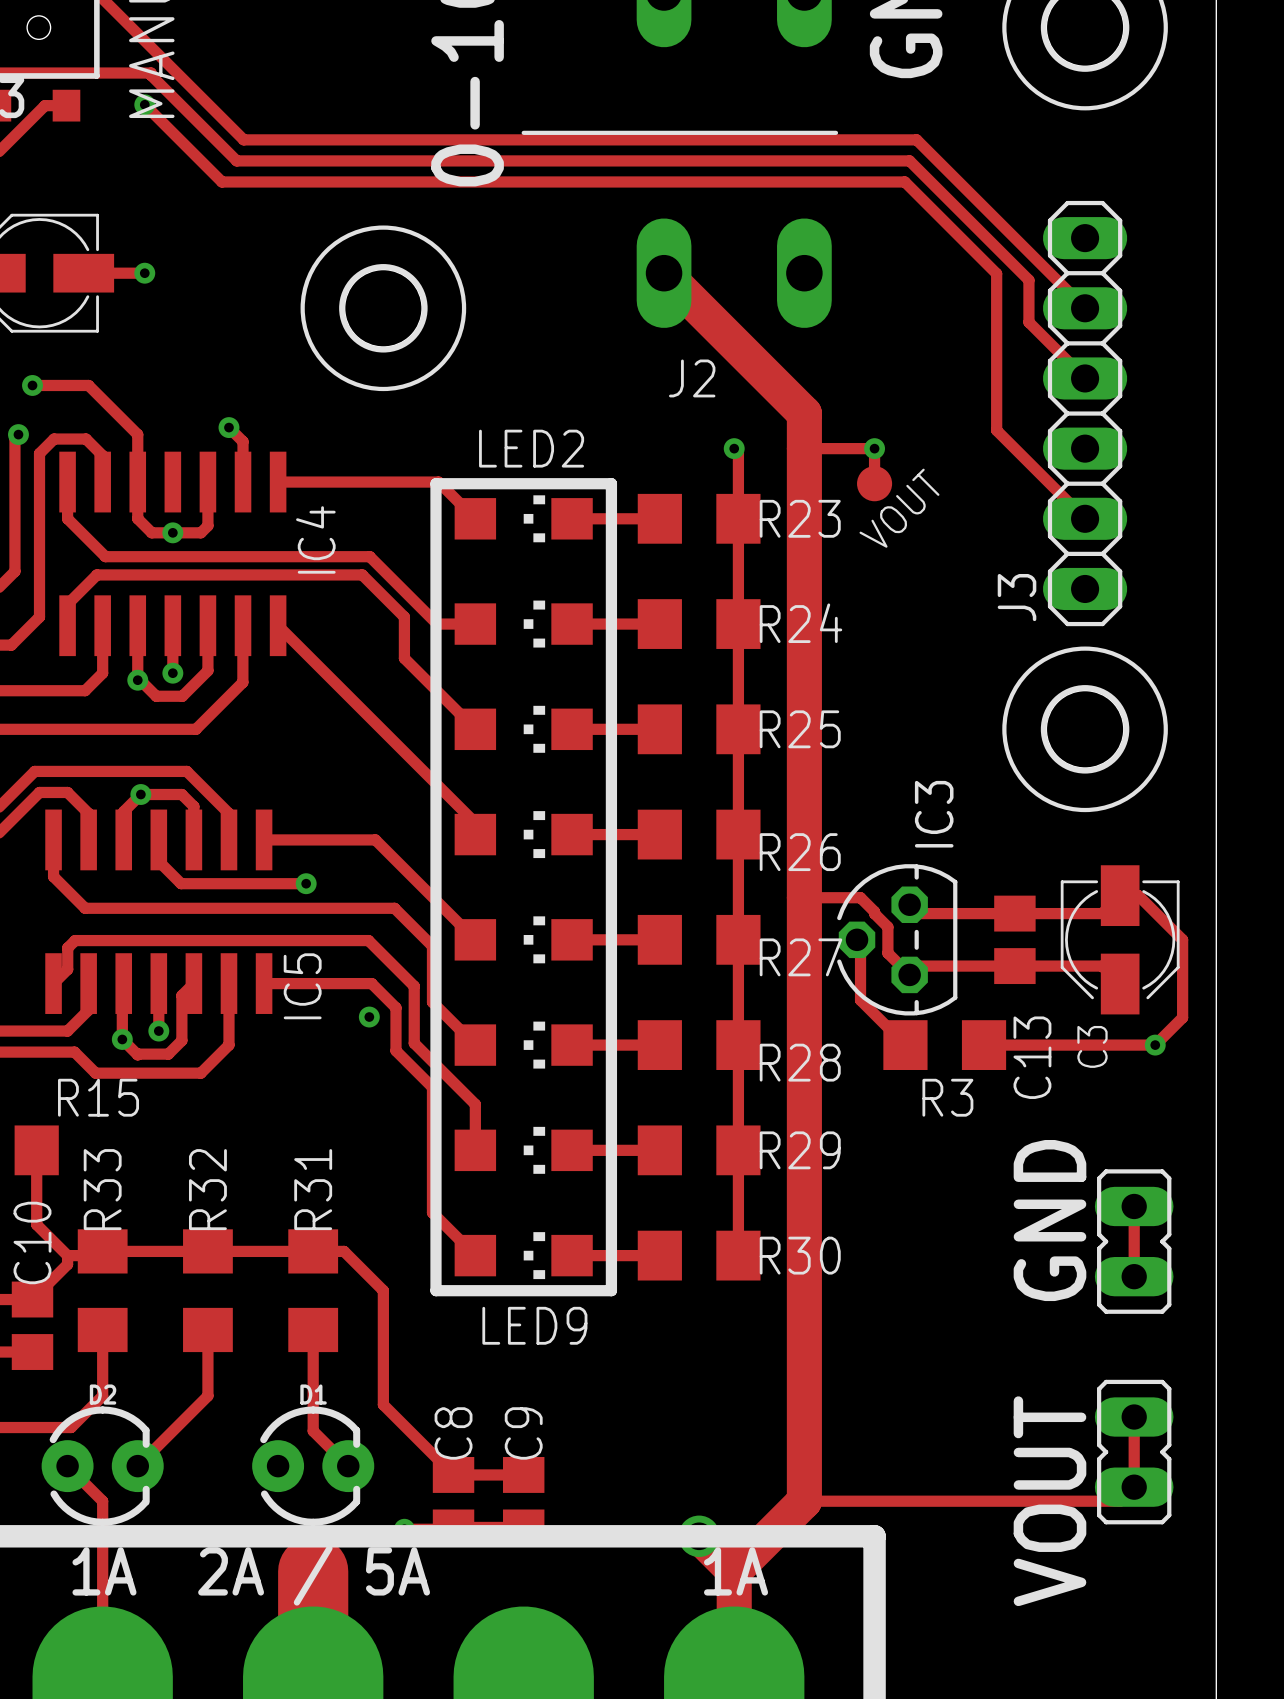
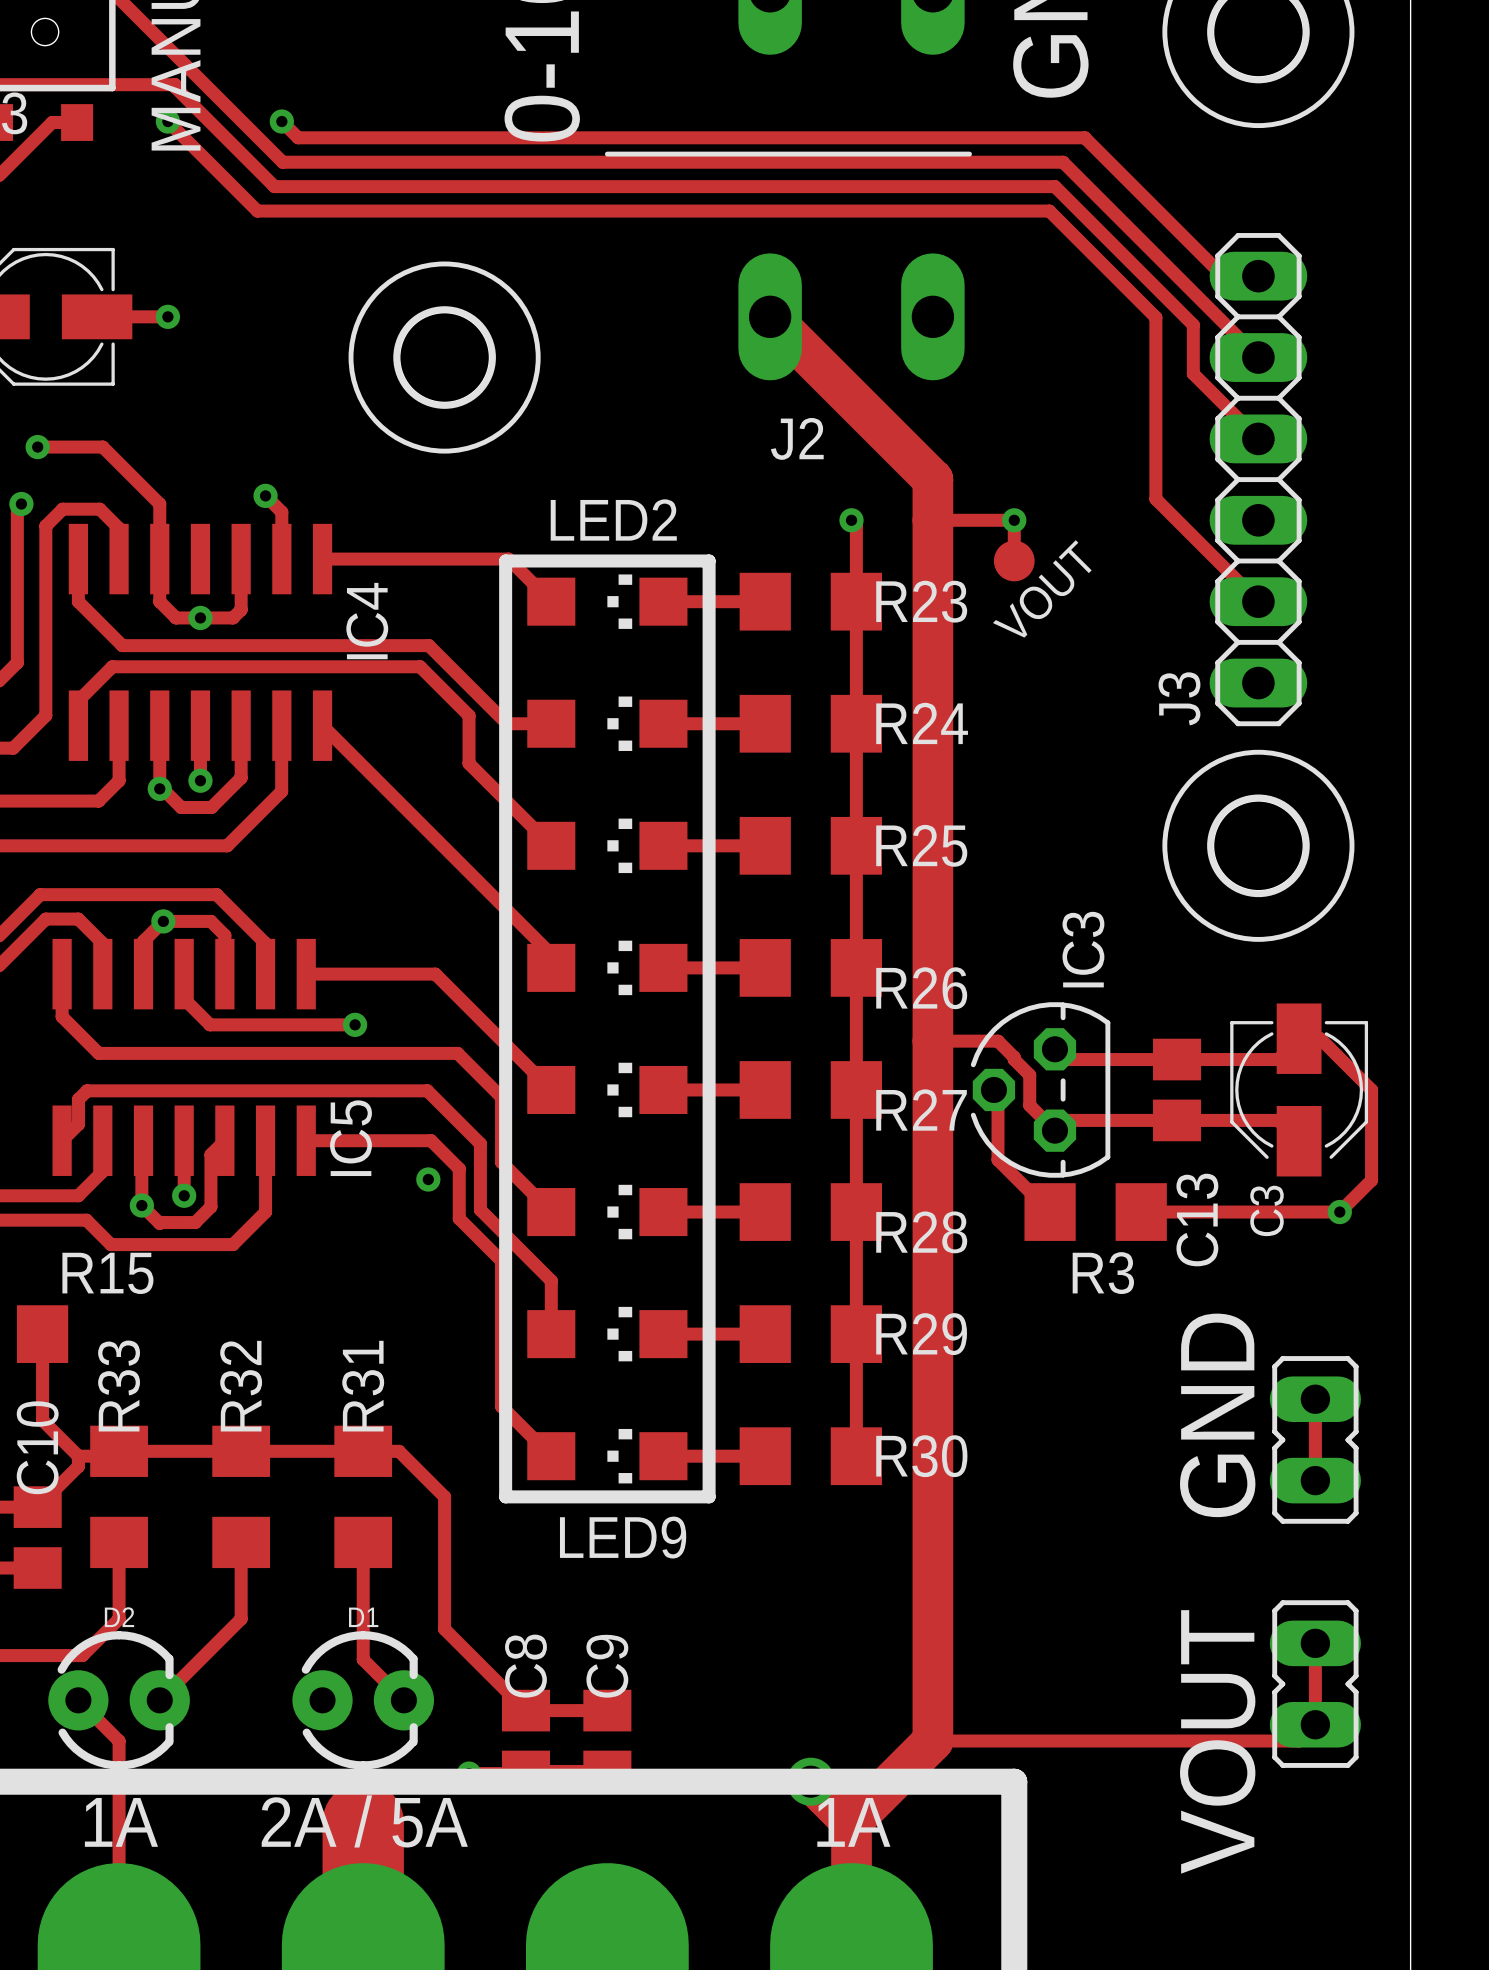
track: none -> (281, 121) (298, 137) (1084, 137) (1223, 276) (1258, 276)
via: none -> (281, 121)

